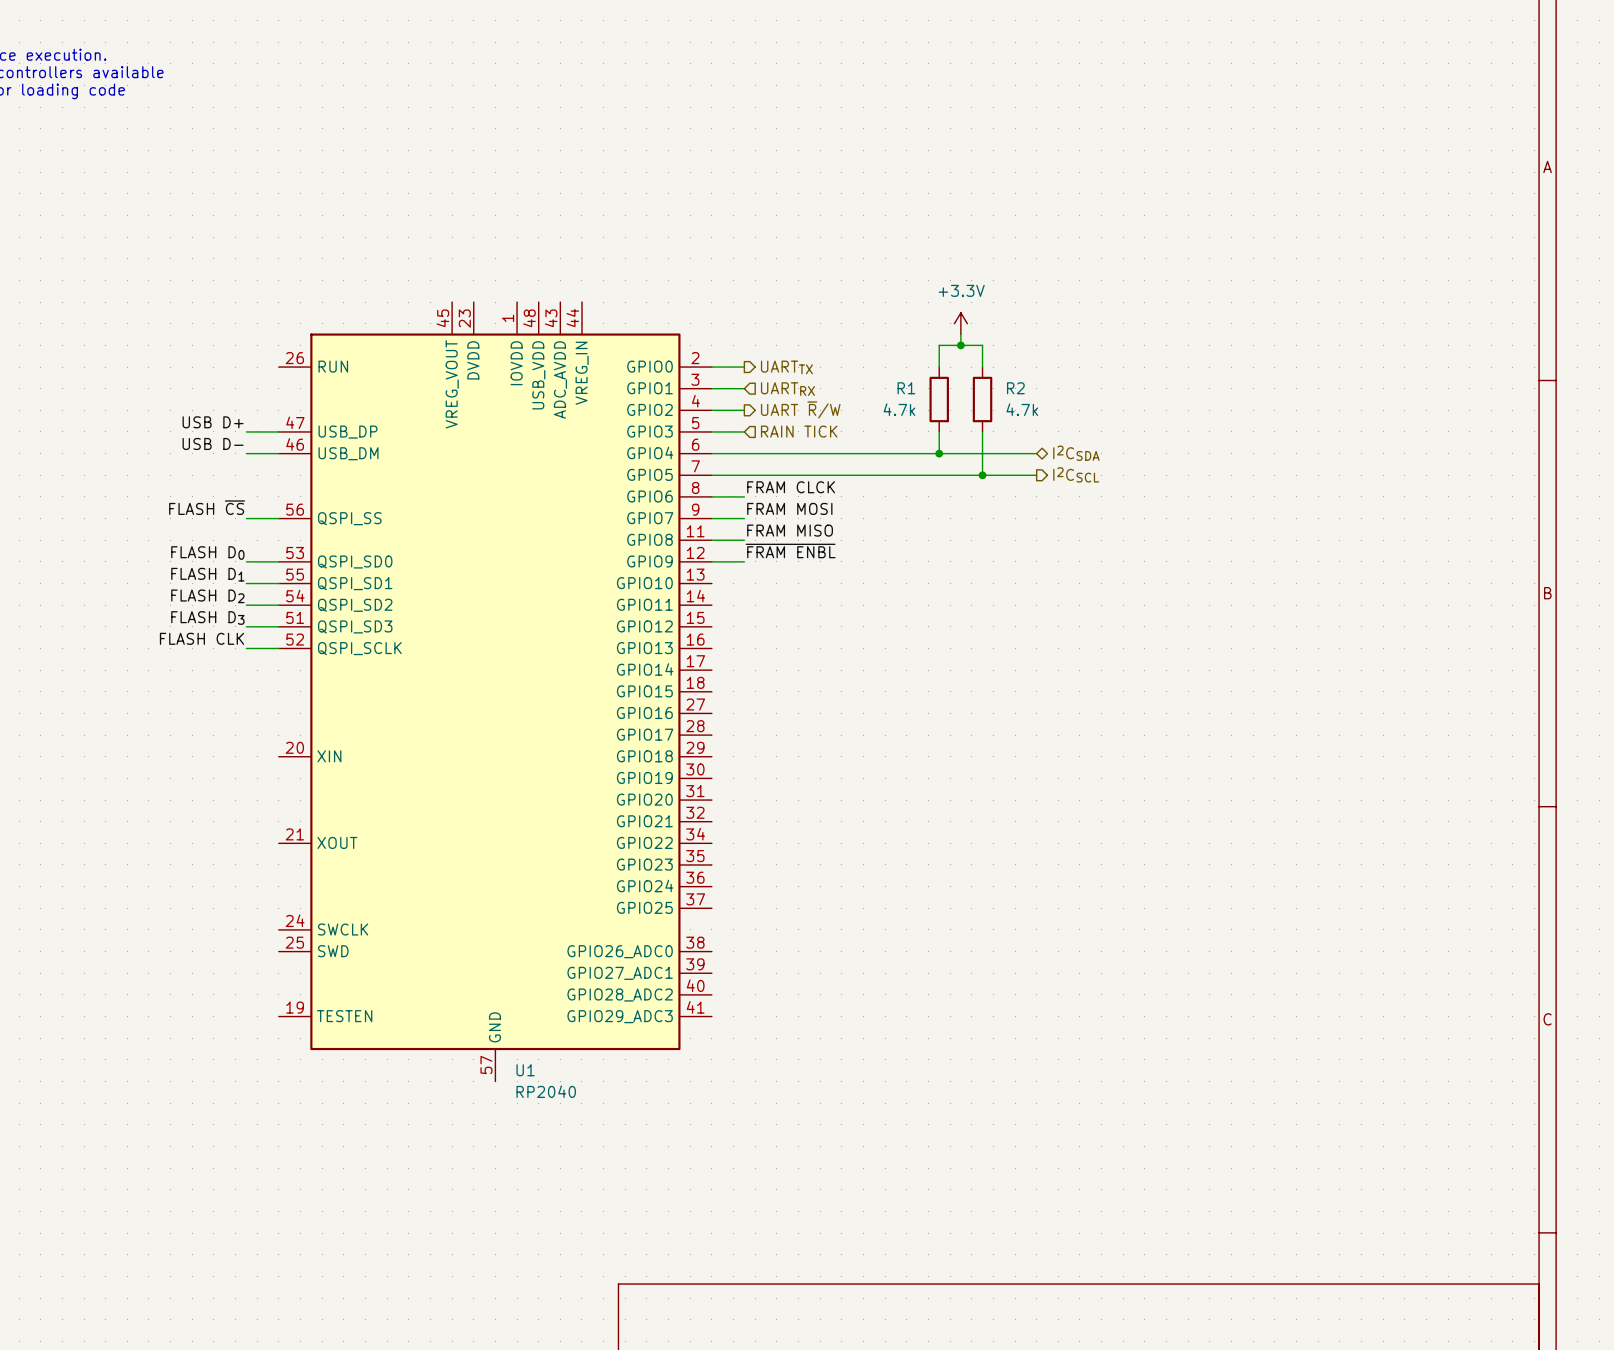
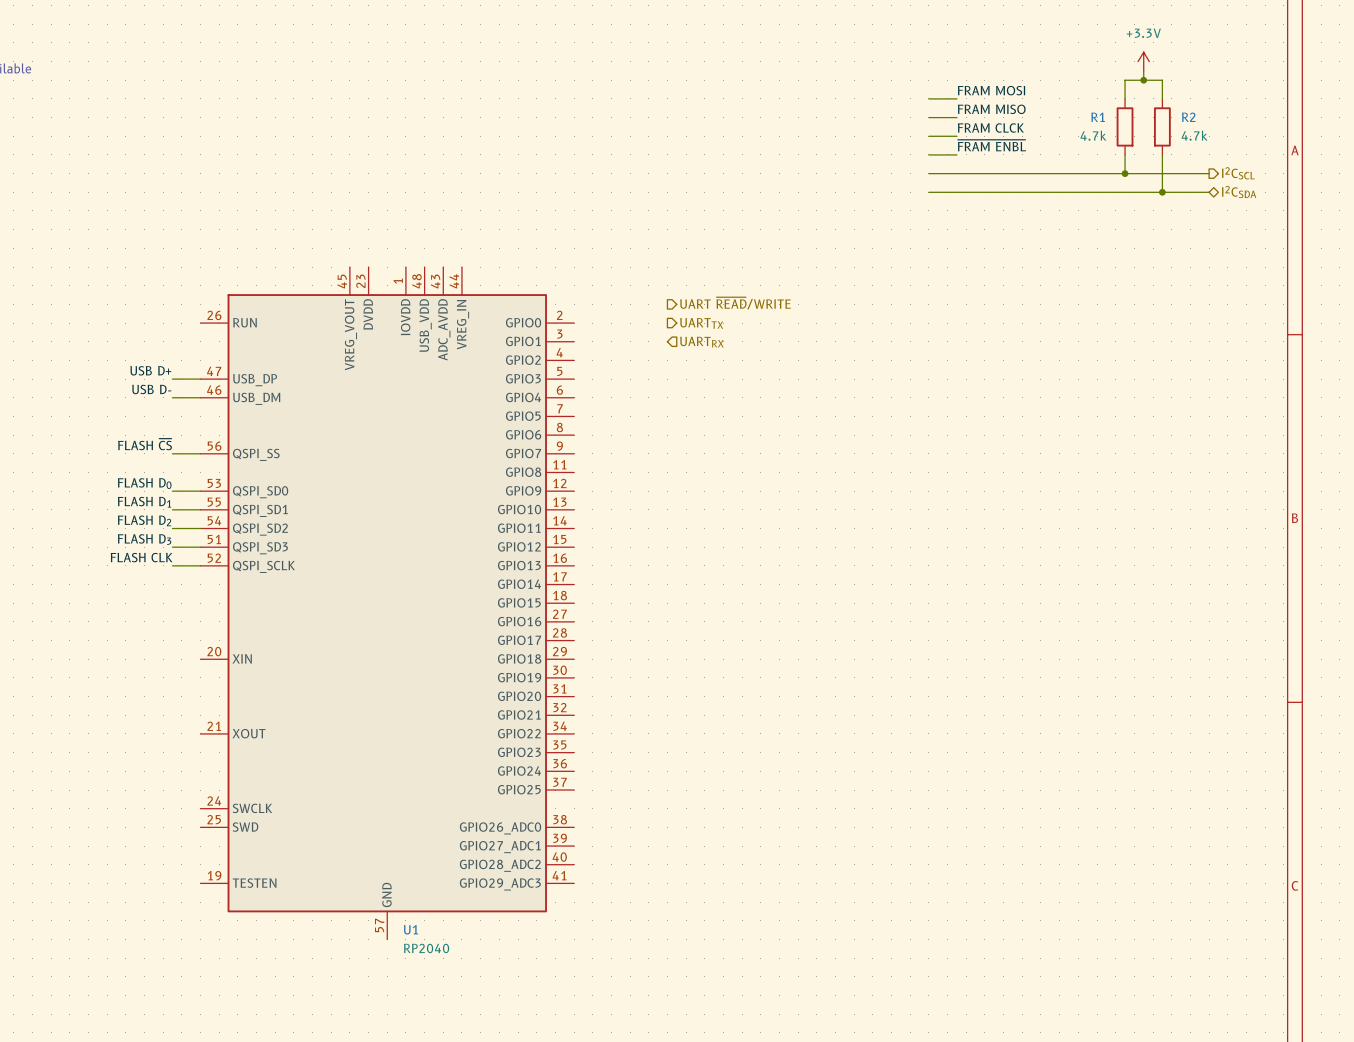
power symbol: none -> +3.3V (1143, 61)
wire: none -> (1143, 70) (1143, 80)
junction: none -> (1143, 80)
label: none -> FRAM MOSI (991, 90)
wire: none -> (928, 98) (956, 98)
wire: none -> (1125, 98) (1125, 80) (1162, 80) (1162, 98)
label: none -> FRAM MISO (991, 109)
wire: none -> (928, 117) (956, 117)
label: none -> FRAM CLCK (990, 128)
wire: none -> (928, 136) (956, 136)
label: none -> ~{FRAM ENBL} (991, 145)
wire: none -> (928, 154) (956, 154)
wire: none -> (1125, 154) (1125, 173)
wire: none -> (1162, 154) (1162, 192)
wire: none -> (928, 173) (1209, 173)
junction: none -> (1125, 173)
hierarchical label: none -> I2CSCL (1238, 173)
wire: none -> (928, 192) (1209, 192)
junction: none -> (1162, 192)
hierarchical label: none -> I2CSDA (1239, 192)
power symbol: +3.3V (960, 323) -> none
hierarchical label: none -> UART ~{READ}/WRITE (735, 303)
junction: (960, 345) -> none
wire: (711, 367) (744, 367) -> none
hierarchical label position: UARTTX (786, 367) -> UARTTX (701, 323)
wire: (939, 367) (939, 345) (982, 345) (982, 367) -> none
wire: (711, 388) (744, 388) -> none
hierarchical label position: UARTRX (787, 389) -> UARTRX (701, 342)
R1 position: (939, 399) -> (1125, 126)
R2 position: (982, 399) -> (1162, 126)
hierarchical label: UART ~{R}/W (800, 409) -> none
wire: (711, 410) (744, 410) -> none
wire: (711, 431) (744, 431) -> none
hierarchical label: RAIN TICK (799, 431) -> none
wire: (939, 431) (939, 453) -> none
wire: (982, 431) (982, 475) -> none
wire: (711, 453) (1036, 453) -> none
junction: (939, 453) -> none
hierarchical label: I2CSDA (1076, 453) -> none
hierarchical label: I2CSCL (1076, 474) -> none
wire: (711, 475) (1036, 475) -> none
junction: (982, 475) -> none
label: FRAM CLCK (791, 487) -> none
wire: (711, 496) (744, 496) -> none
label: FRAM MOSI (789, 508) -> none
wire: (711, 518) (744, 518) -> none
label: FRAM MISO (790, 530) -> none
wire: (711, 540) (744, 540) -> none
label: ~{FRAM ENBL} (790, 550) -> none
wire: (711, 561) (744, 561) -> none

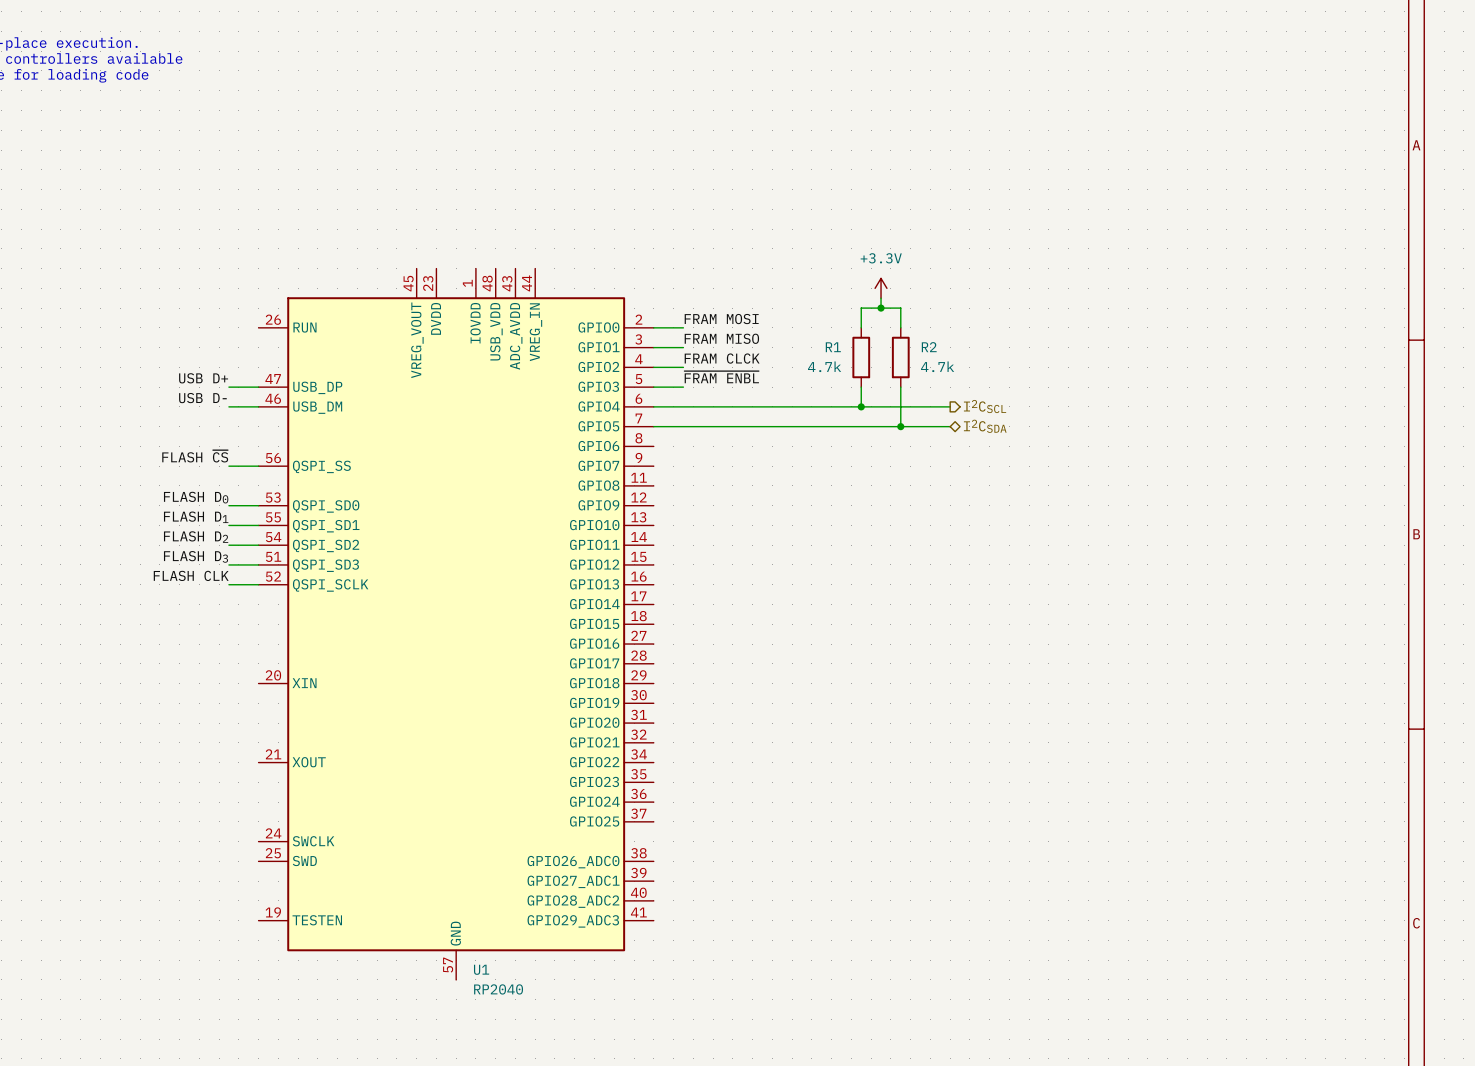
power symbol: +3.3V (1143, 61) -> none
wire: (1143, 70) (1143, 80) -> none
junction: (1143, 80) -> none
label: FRAM MOSI (991, 90) -> none
wire: (928, 98) (956, 98) -> none
wire: (1125, 98) (1125, 80) (1162, 80) (1162, 98) -> none
label: FRAM MISO (991, 109) -> none
wire: (928, 117) (956, 117) -> none
R1 position: (1125, 126) -> (861, 357)
R2 position: (1162, 126) -> (900, 357)
label: FRAM CLCK (990, 128) -> none
wire: (928, 136) (956, 136) -> none
label: ~{FRAM ENBL} (991, 145) -> none
wire: (928, 154) (956, 154) -> none
wire: (1125, 154) (1125, 173) -> none
wire: (1162, 154) (1162, 192) -> none
wire: (928, 173) (1209, 173) -> none
junction: (1125, 173) -> none
hierarchical label: I2CSCL (1238, 173) -> none
wire: (928, 192) (1209, 192) -> none
junction: (1162, 192) -> none
hierarchical label: I2CSDA (1239, 192) -> none
power symbol: none -> +3.3V (881, 288)
wire: none -> (881, 298) (881, 308)
hierarchical label: UART ~{READ}/WRITE (735, 303) -> none
junction: none -> (881, 308)
label: none -> FRAM MOSI (721, 319)
wire: none -> (653, 327) (683, 327)
hierarchical label: UARTTX (701, 323) -> none
wire: none -> (861, 327) (861, 308) (900, 308) (900, 327)
label: none -> FRAM MISO (721, 338)
wire: none -> (653, 347) (683, 347)
hierarchical label: UARTRX (701, 342) -> none
label: none -> FRAM CLCK (722, 358)
wire: none -> (653, 367) (683, 367)
label: none -> ~{FRAM ENBL} (721, 377)
wire: none -> (653, 387) (683, 387)
wire: none -> (861, 387) (861, 406)
wire: none -> (900, 387) (900, 426)
wire: none -> (653, 406) (950, 406)
junction: none -> (861, 406)
hierarchical label: none -> I2CSCL (985, 406)
wire: none -> (653, 426) (950, 426)
junction: none -> (900, 426)
hierarchical label: none -> I2CSDA (985, 426)

